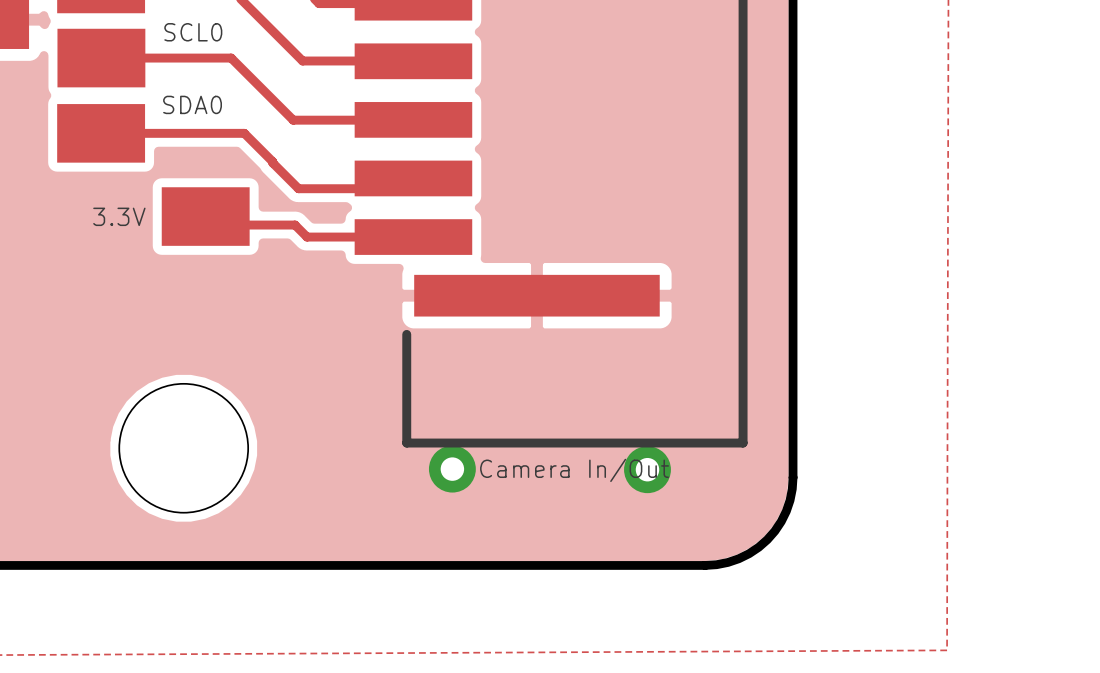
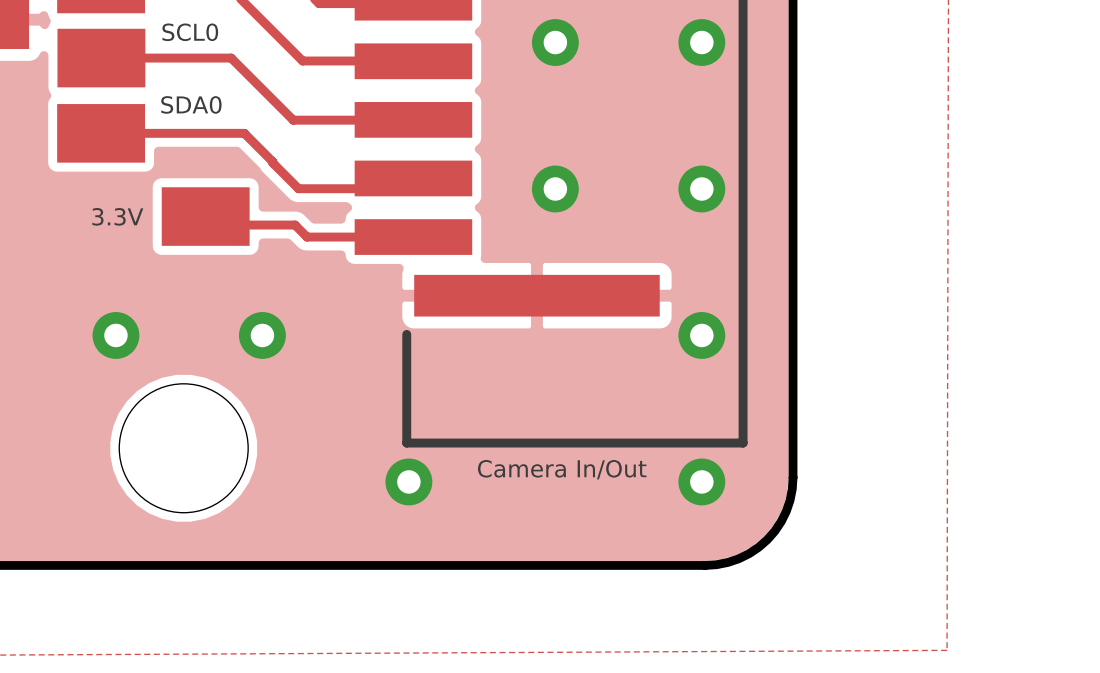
via: none -> (555, 42)
via: none -> (701, 42)
via: none -> (555, 189)
via: none -> (701, 189)
via: none -> (115, 335)
via: none -> (262, 335)
via: none -> (701, 335)
via position: (452, 469) -> (408, 481)
via position: (647, 469) -> (701, 481)

